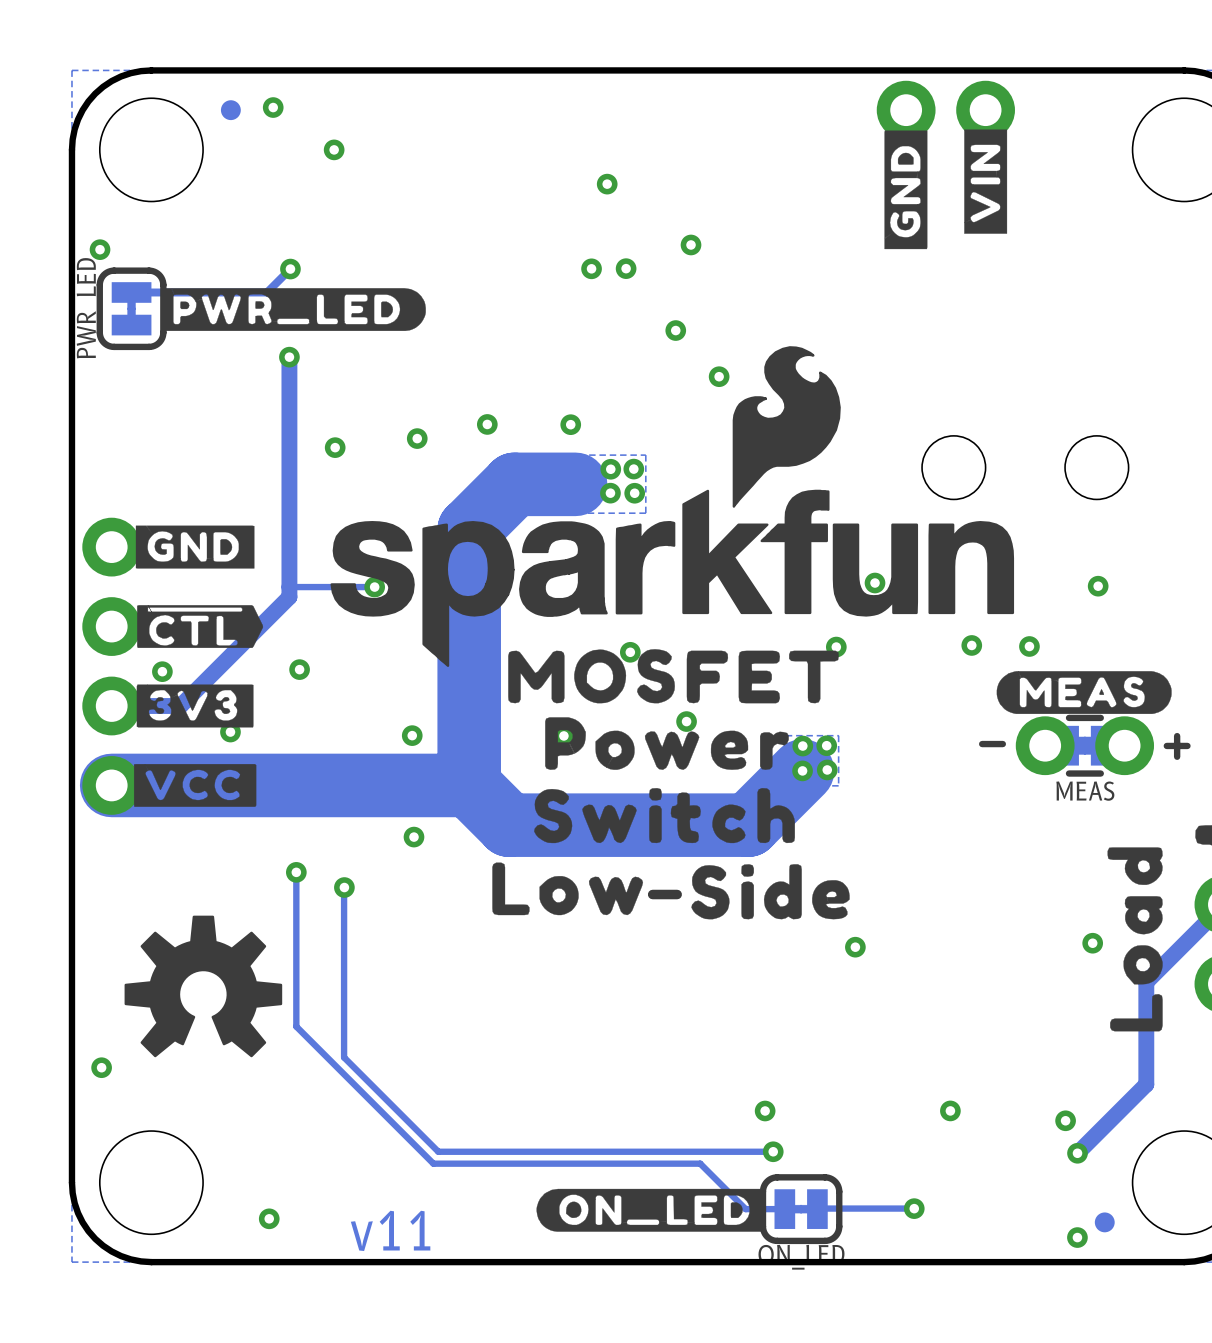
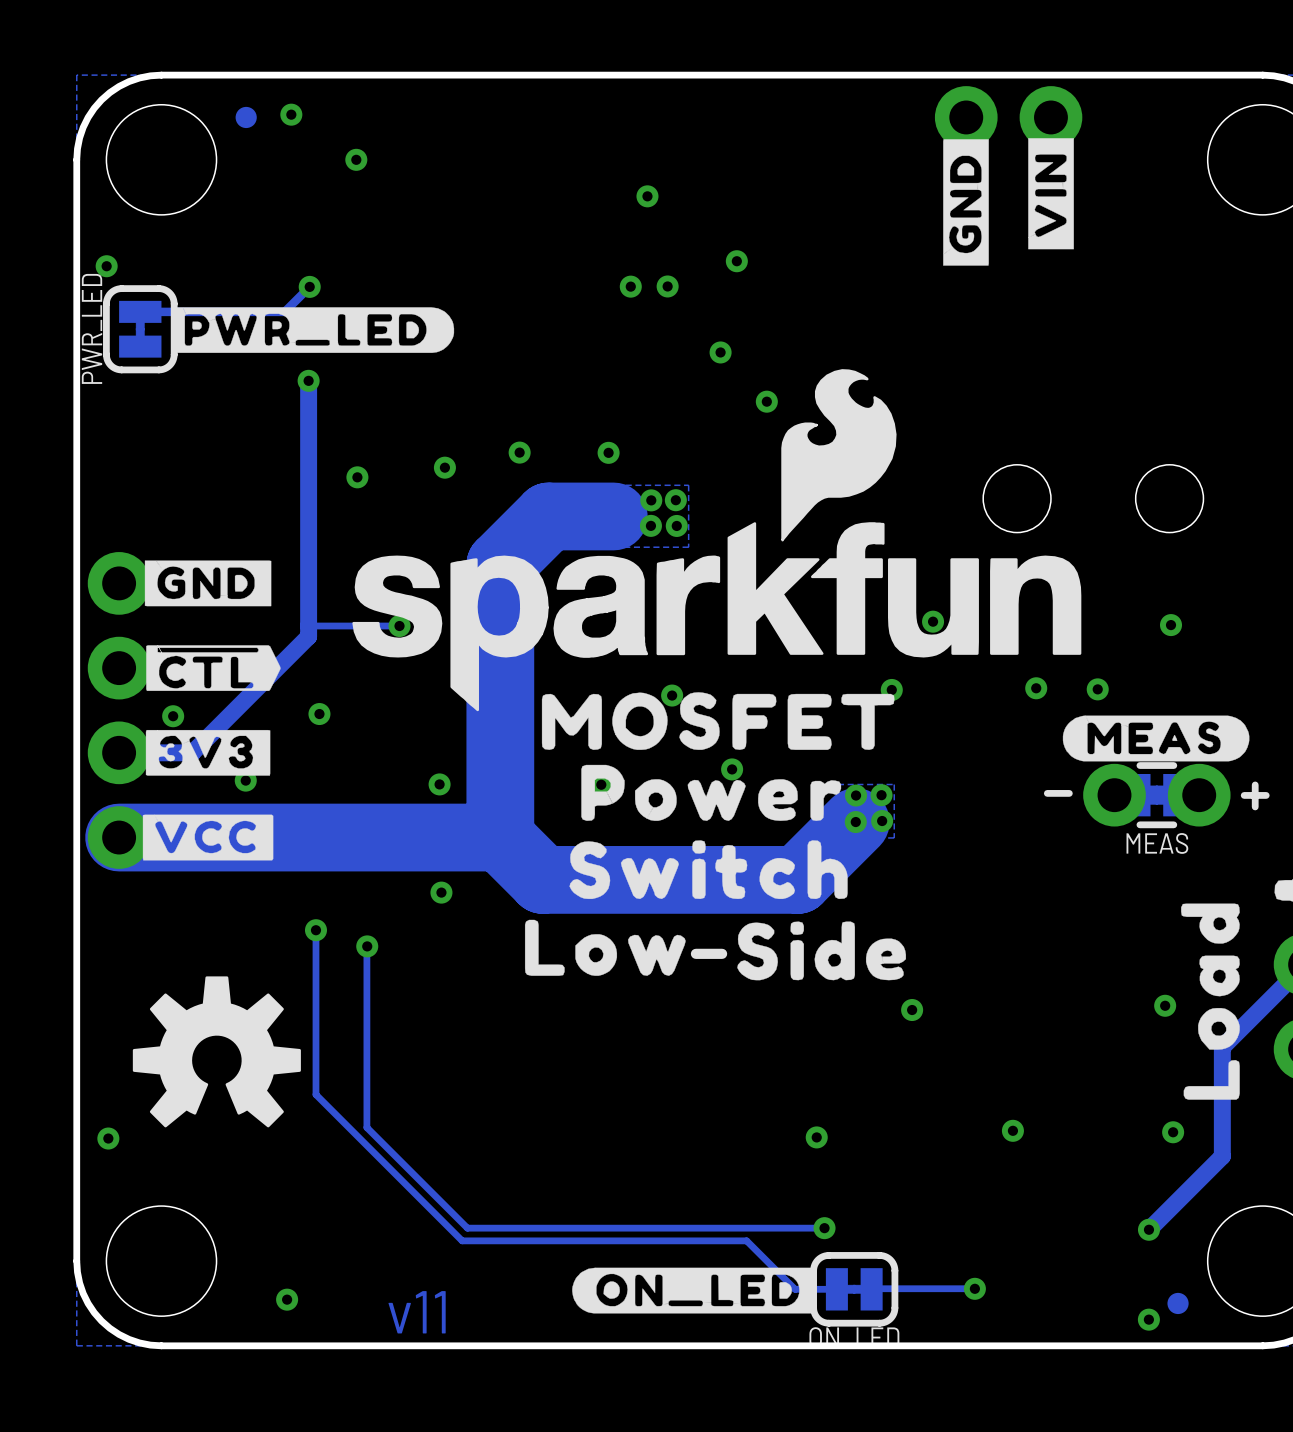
via: none -> (1173, 1132)
via position: (950, 1110) -> (1012, 1130)
via position: (765, 1111) -> (816, 1137)
via: (1065, 1120) -> none

